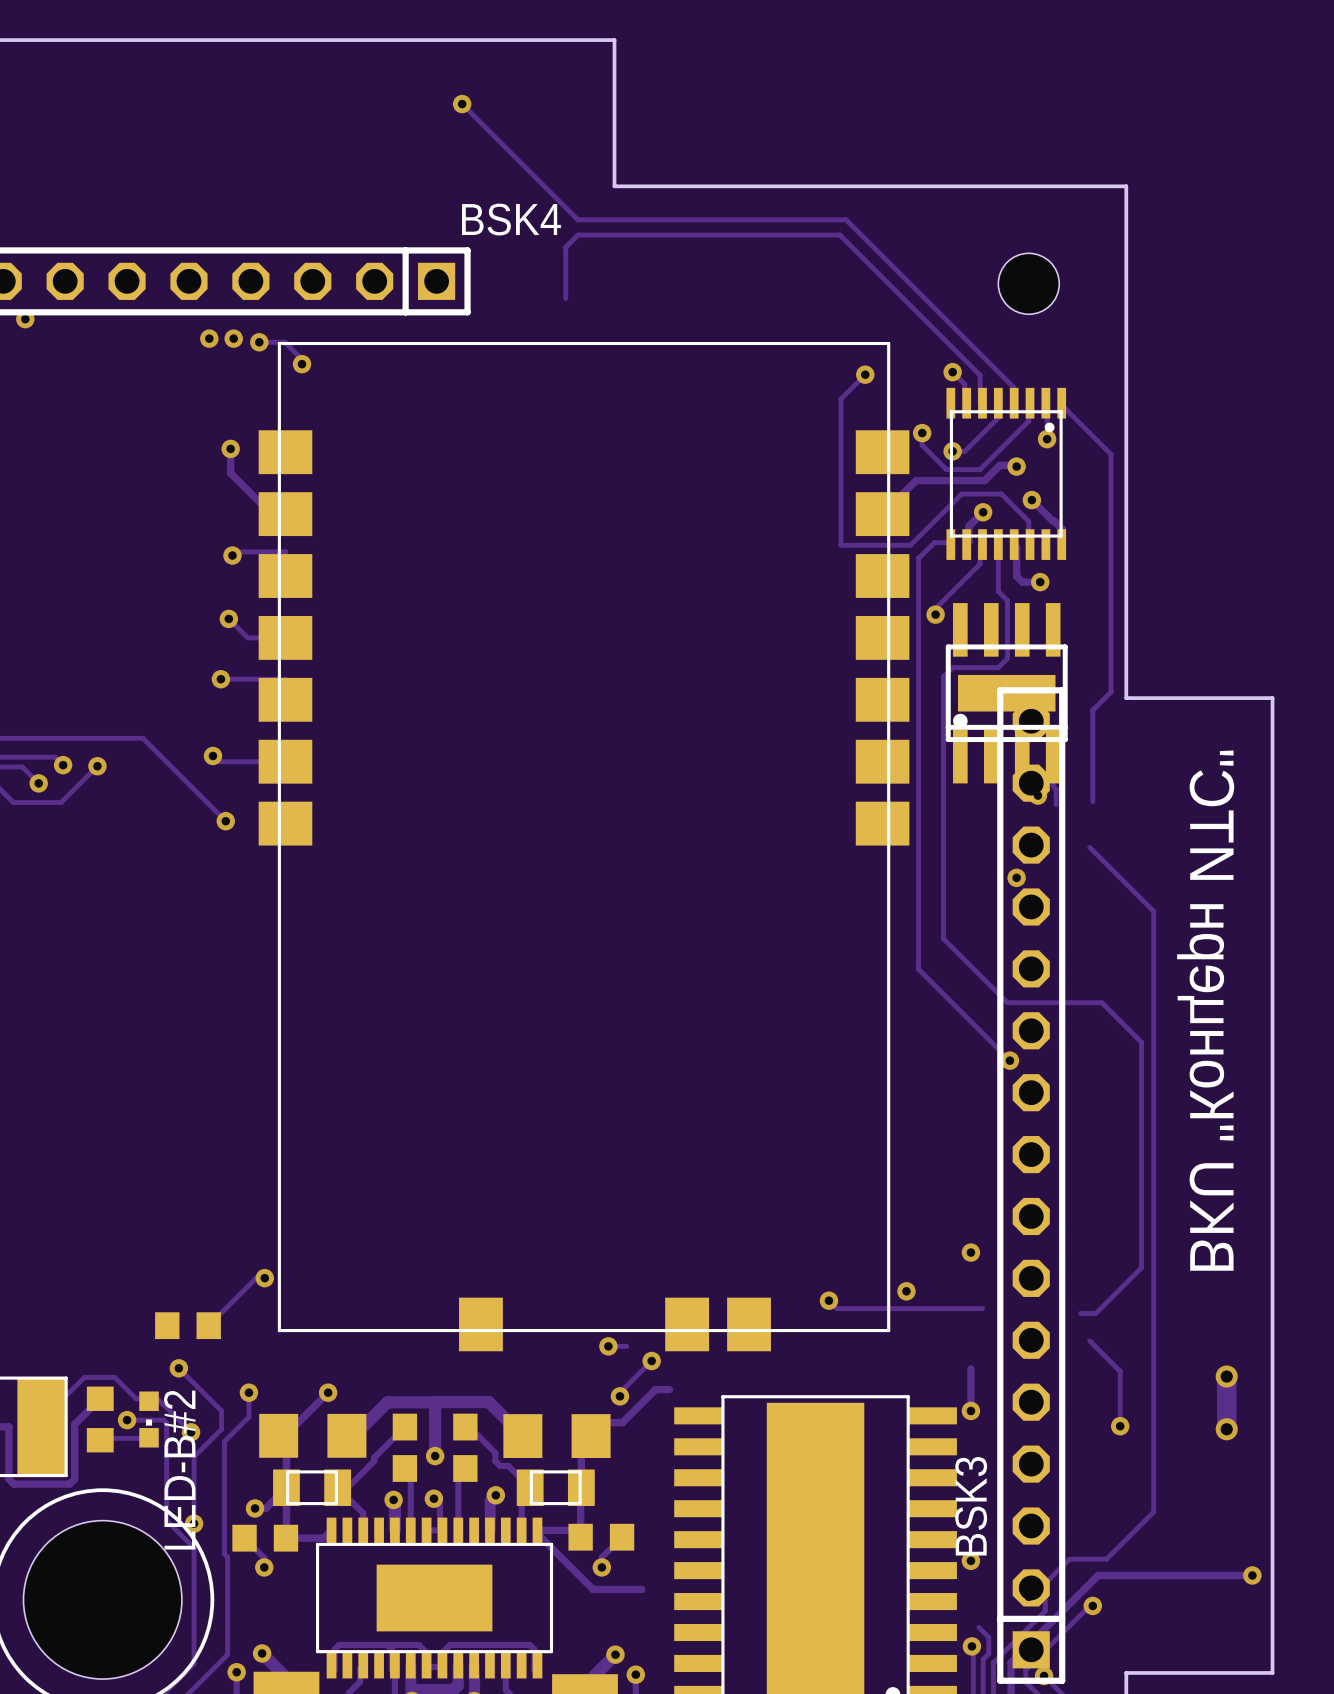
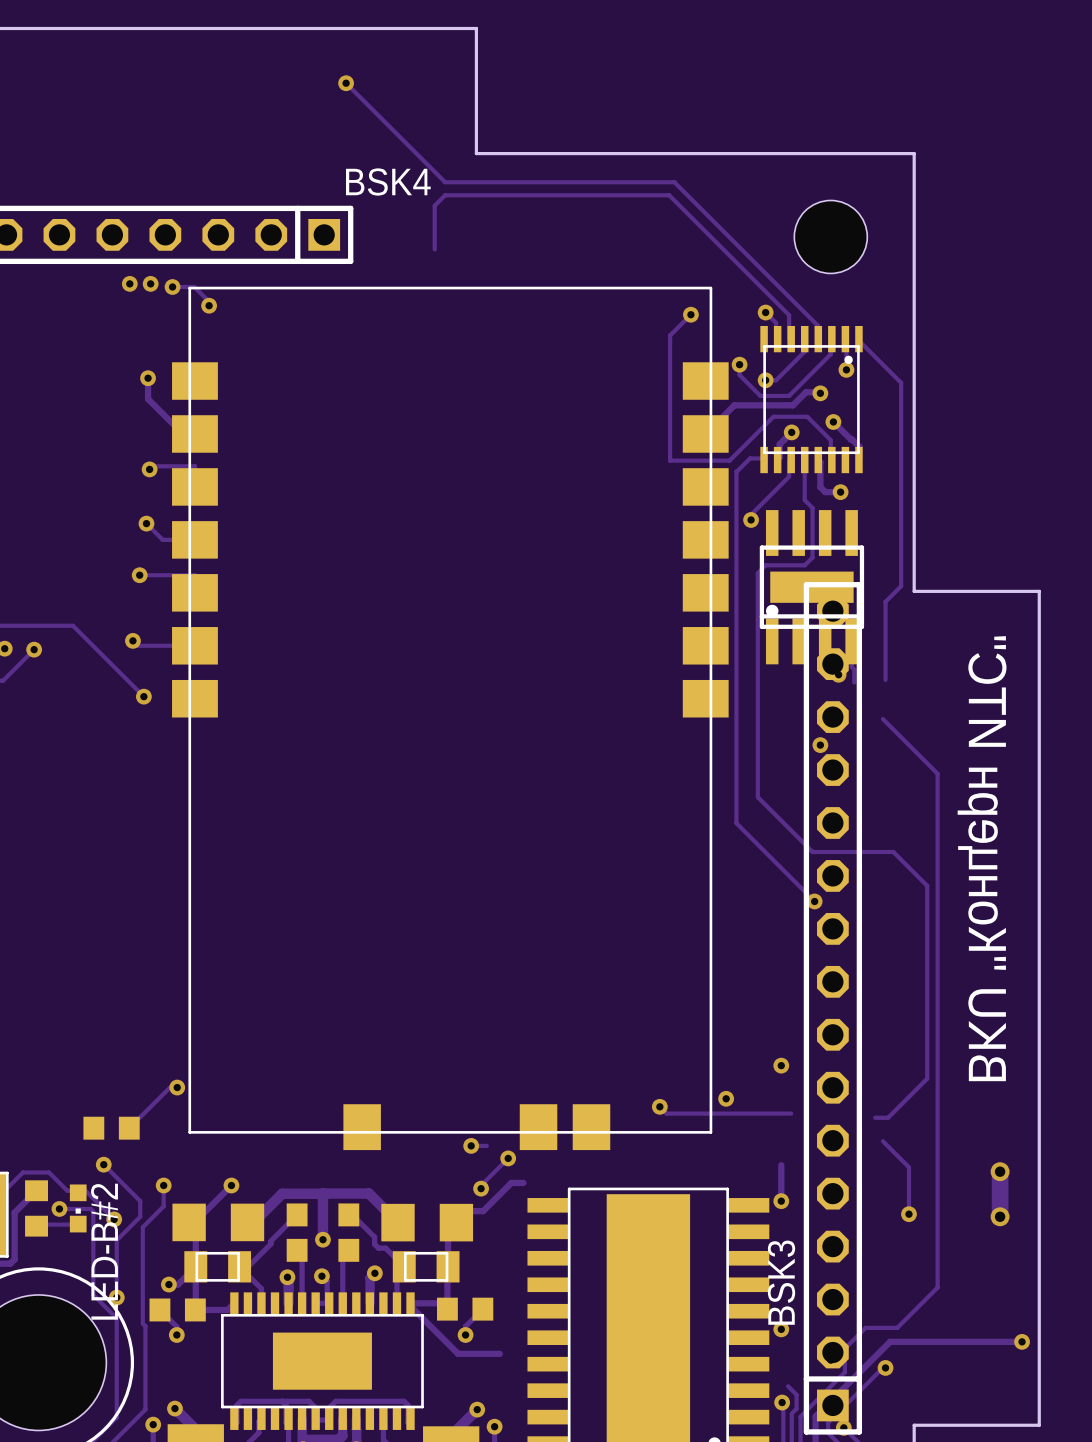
hole size: [998, 253, 1060, 315] -> [794, 200, 868, 274]

